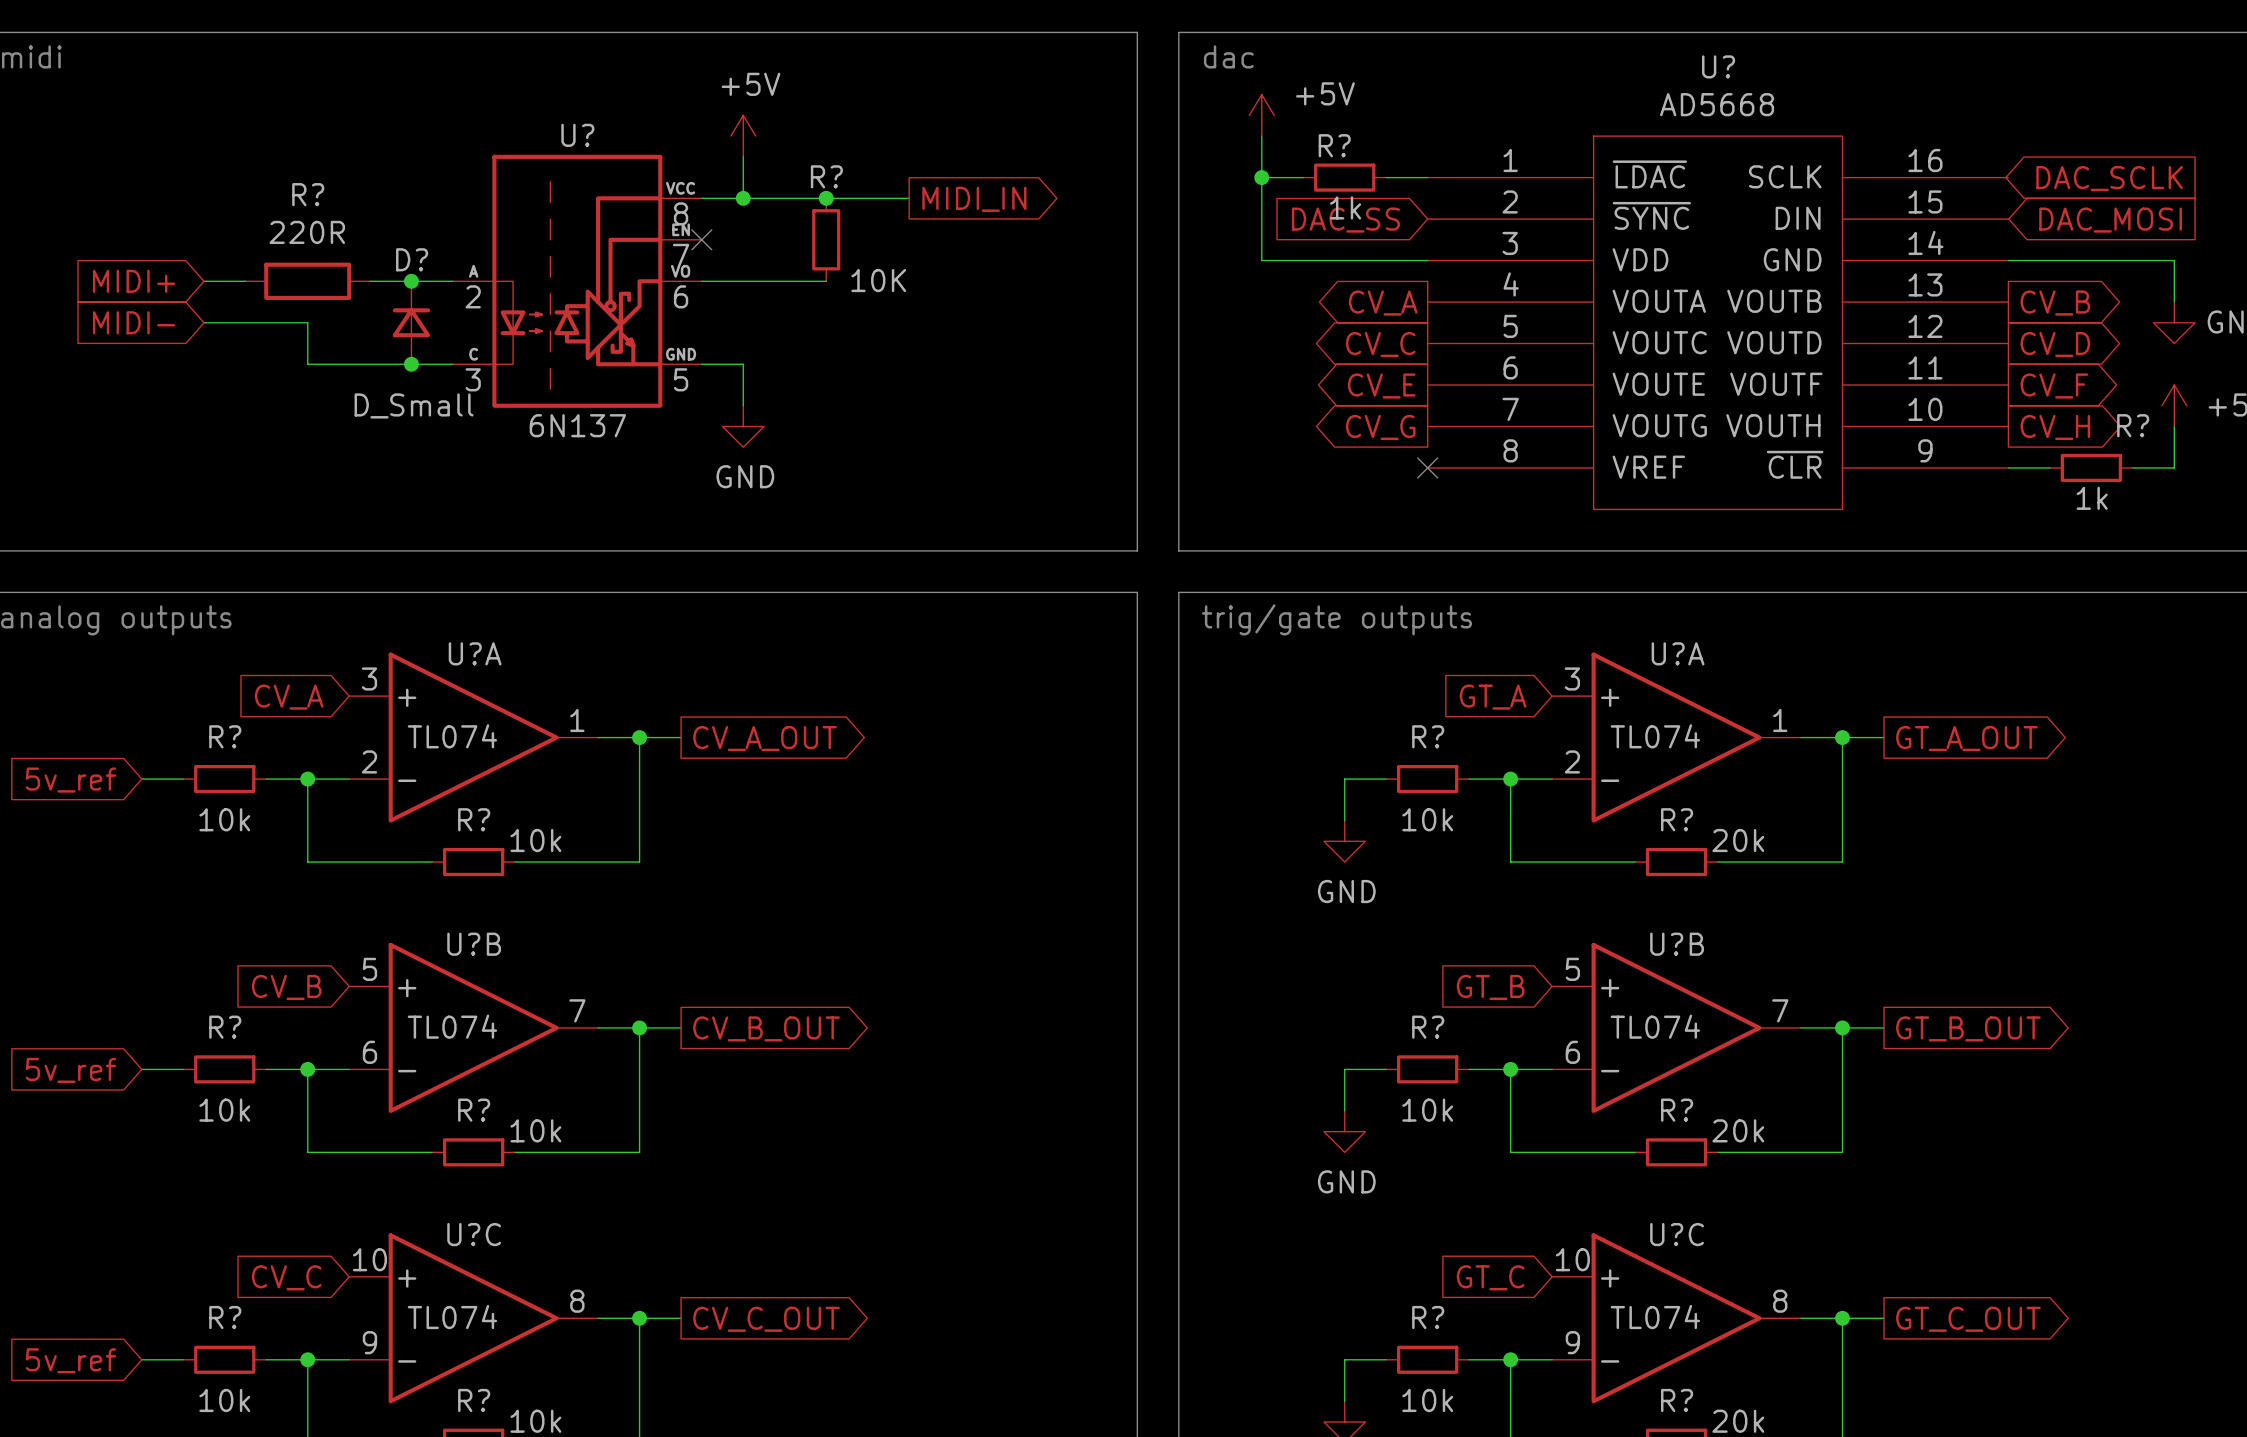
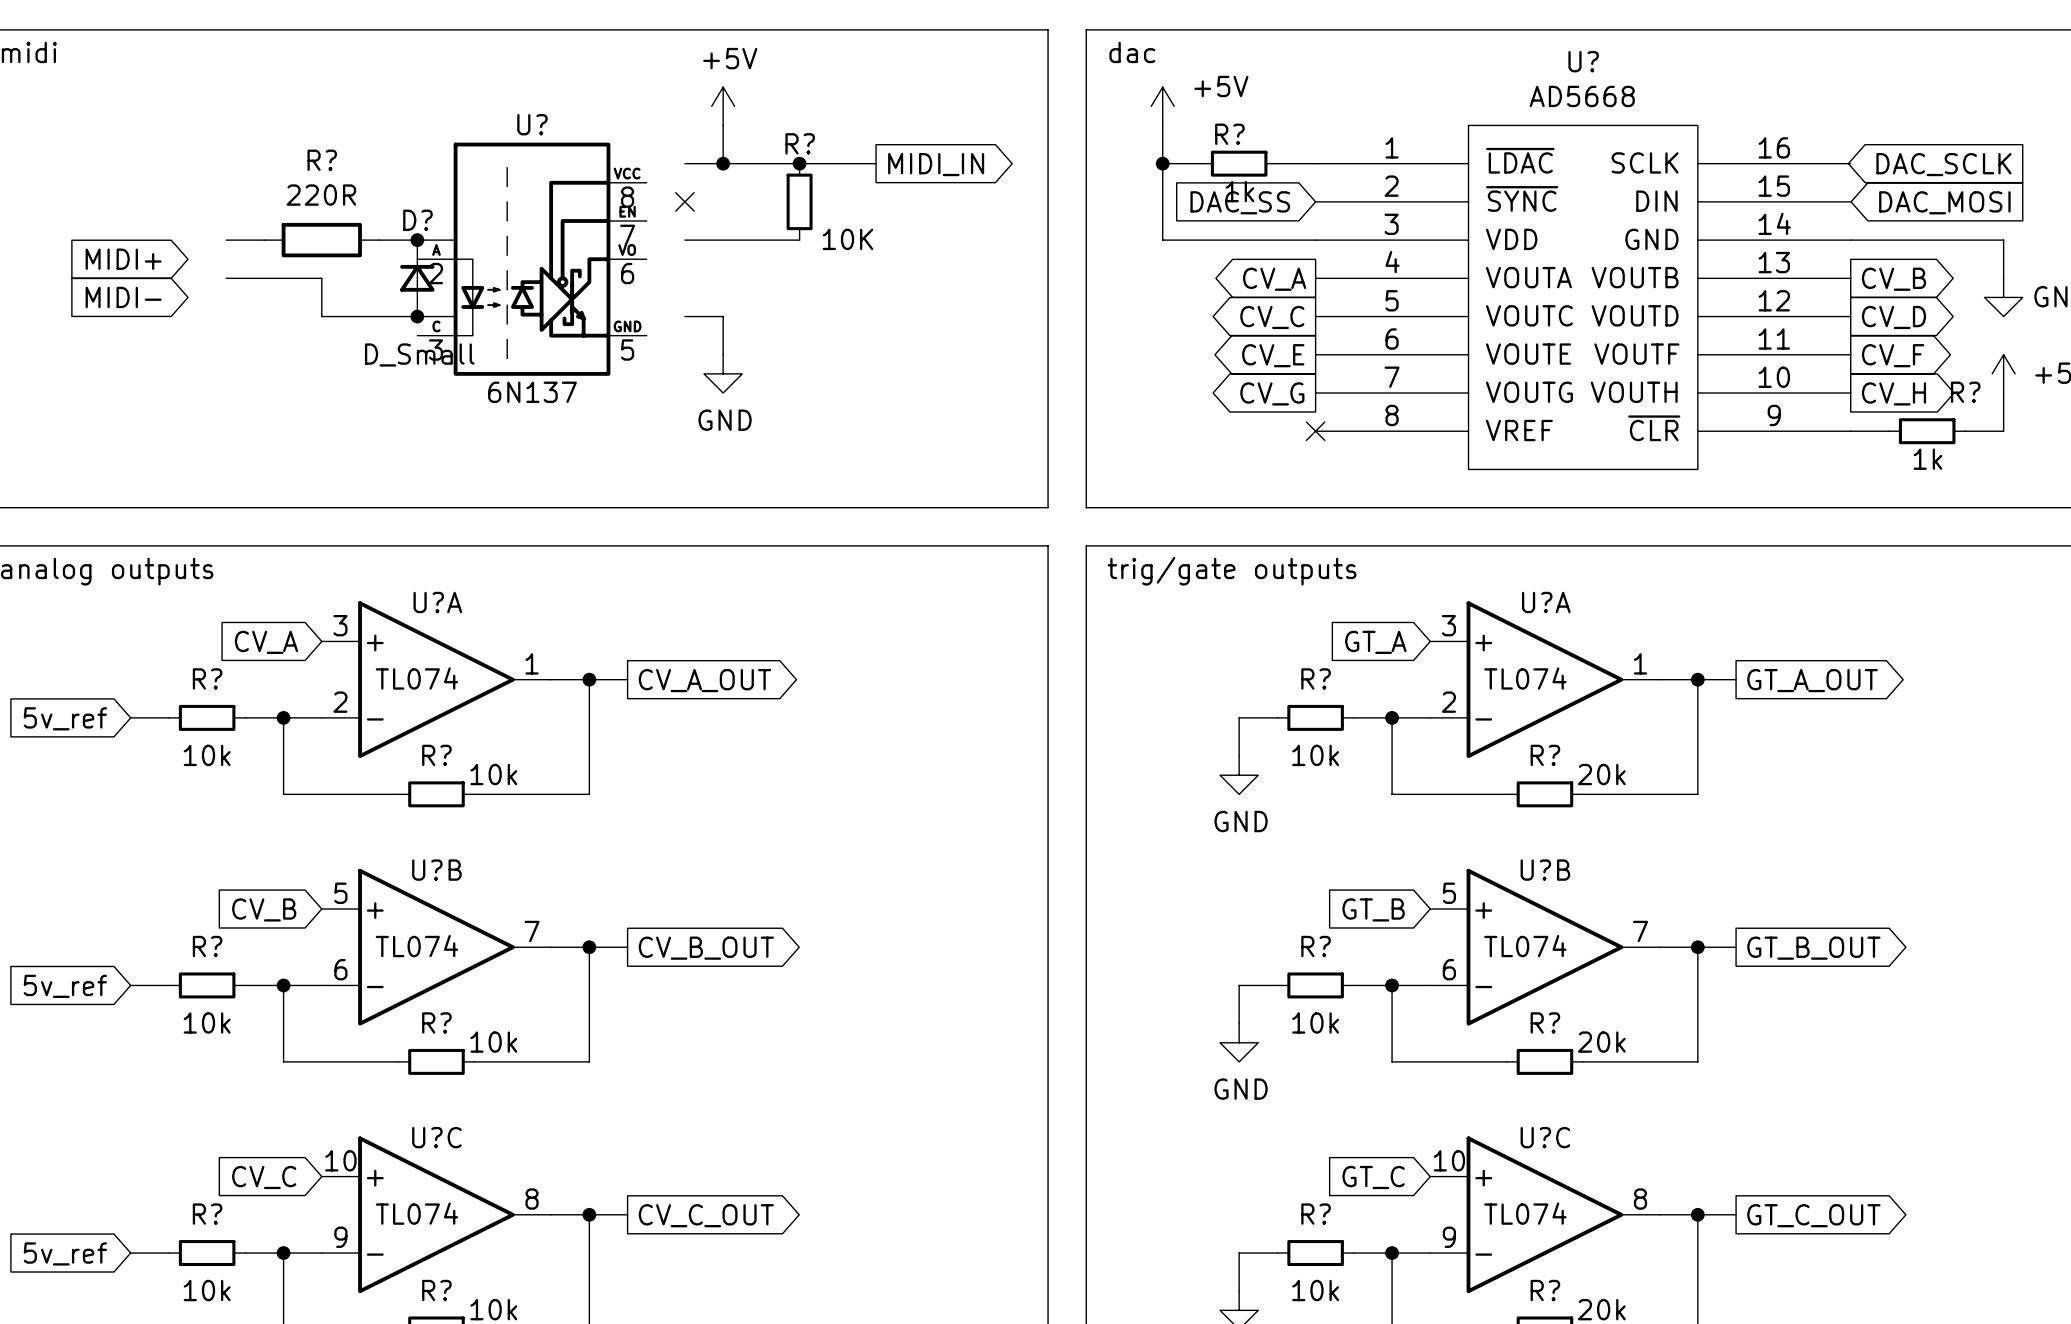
power symbol position: +5V (743, 136) -> +5V (723, 106)
wire: (743, 156) (743, 198) -> (723, 125) (723, 163)
junction: none -> (723, 163)
junction: none -> (799, 163)
wire: (701, 198) (909, 198) -> (684, 163) (876, 163)
junction: (743, 198) -> none
junction: (826, 198) -> none
global label position: MIDI_IN (974, 199) -> MIDI_IN (936, 164)
no-connect mark position: (701, 239) -> (684, 201)
R? position: (826, 239) -> (799, 201)
junction: none -> (417, 240)
wire: (204, 281) (245, 281) -> (226, 240) (264, 240)
R? position: (307, 281) -> (321, 240)
wire: (369, 281) (452, 281) -> (379, 240) (455, 240)
junction: (411, 281) -> none
wire: (701, 281) (826, 281) -> (684, 240) (799, 240)
wire: (204, 322) (307, 322) (307, 364) (452, 364) -> (226, 278) (321, 278) (321, 316) (455, 316)
D? position: (411, 322) -> (417, 278)
junction: none -> (417, 316)
junction: (411, 364) -> none
wire: (701, 364) (743, 364) (743, 405) -> (684, 316) (723, 316) (723, 354)
power symbol position: GND (743, 426) -> GND (723, 373)

